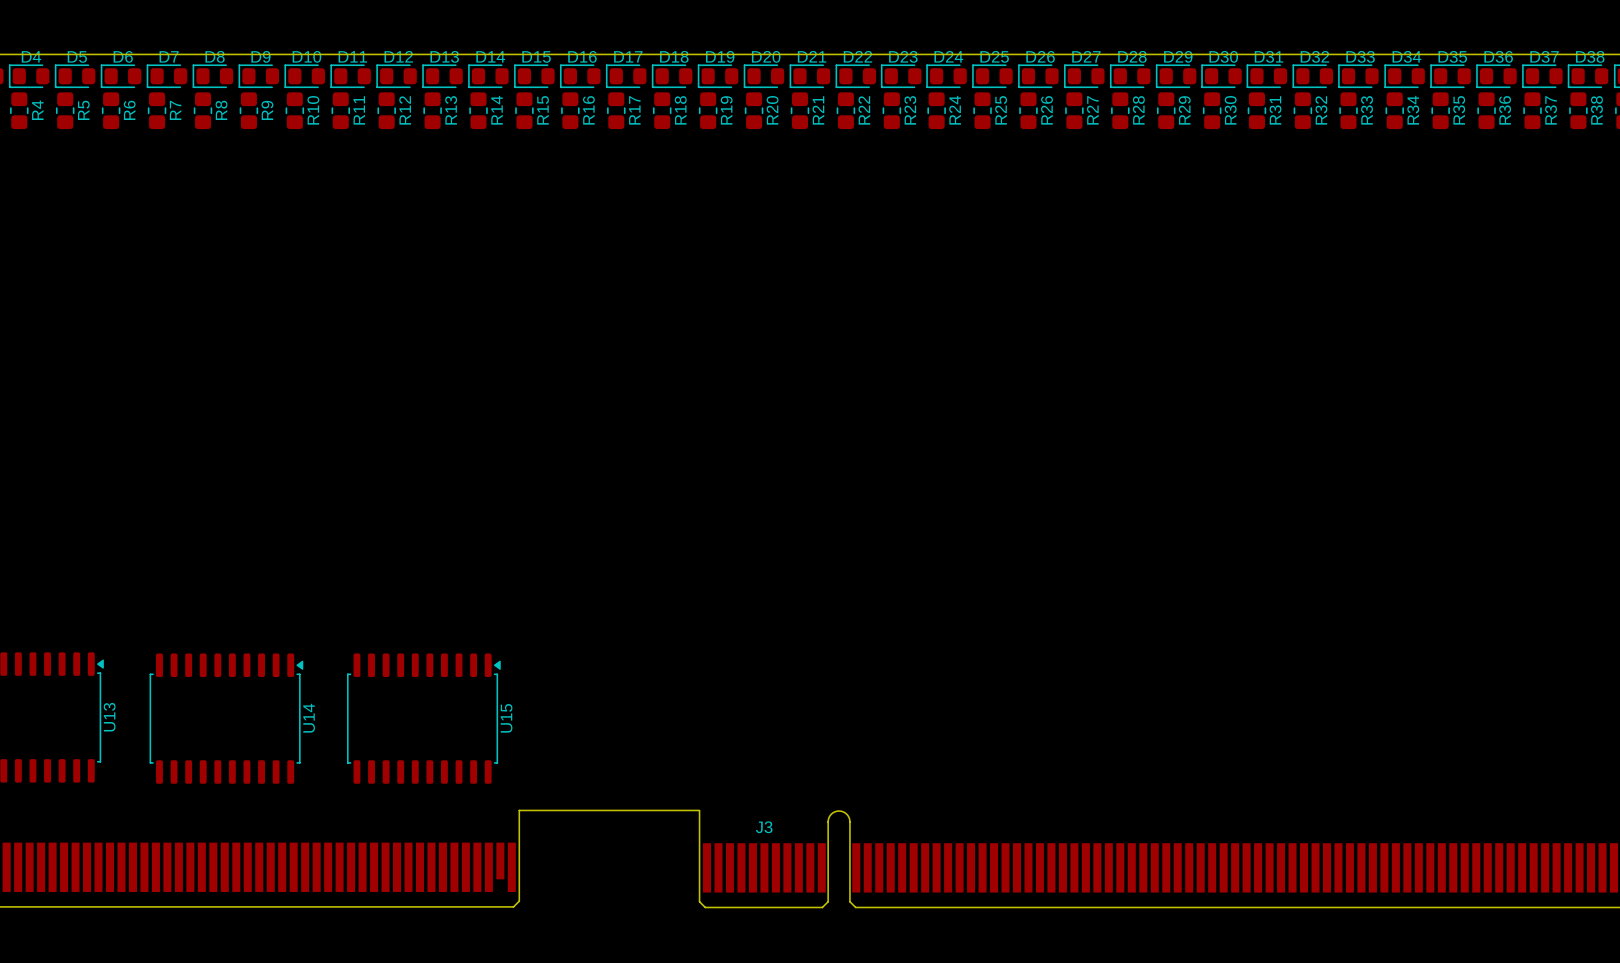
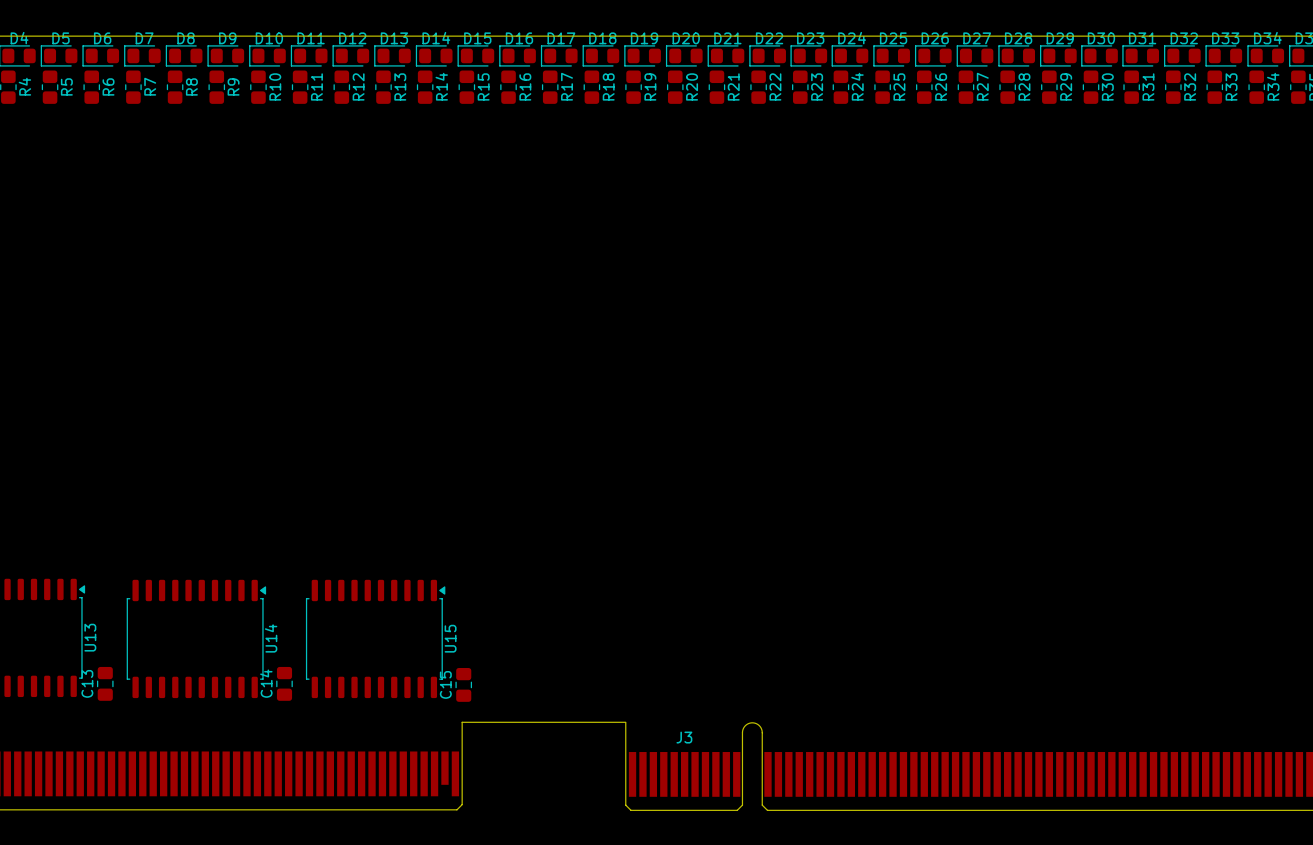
C13: none -> (105, 683)
C14: none -> (284, 683)
C15: none -> (463, 684)

